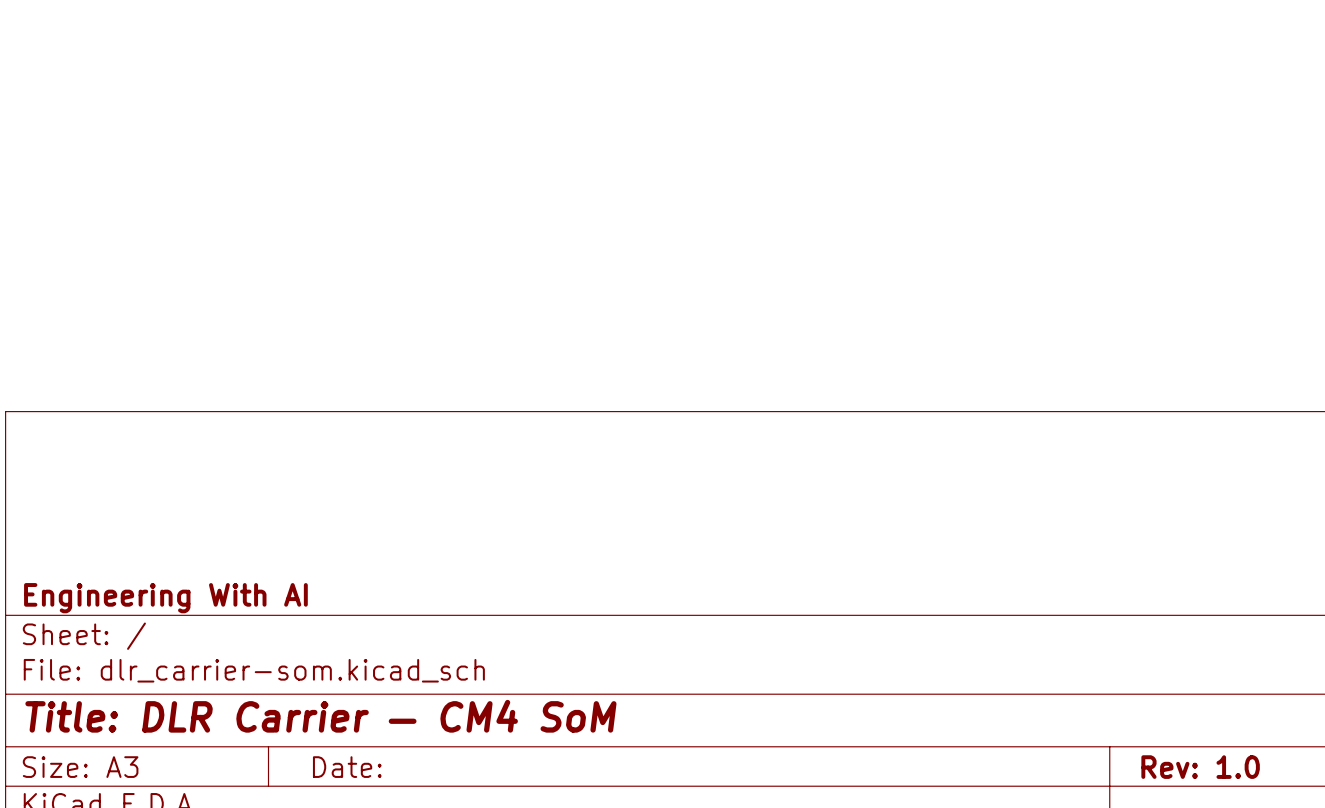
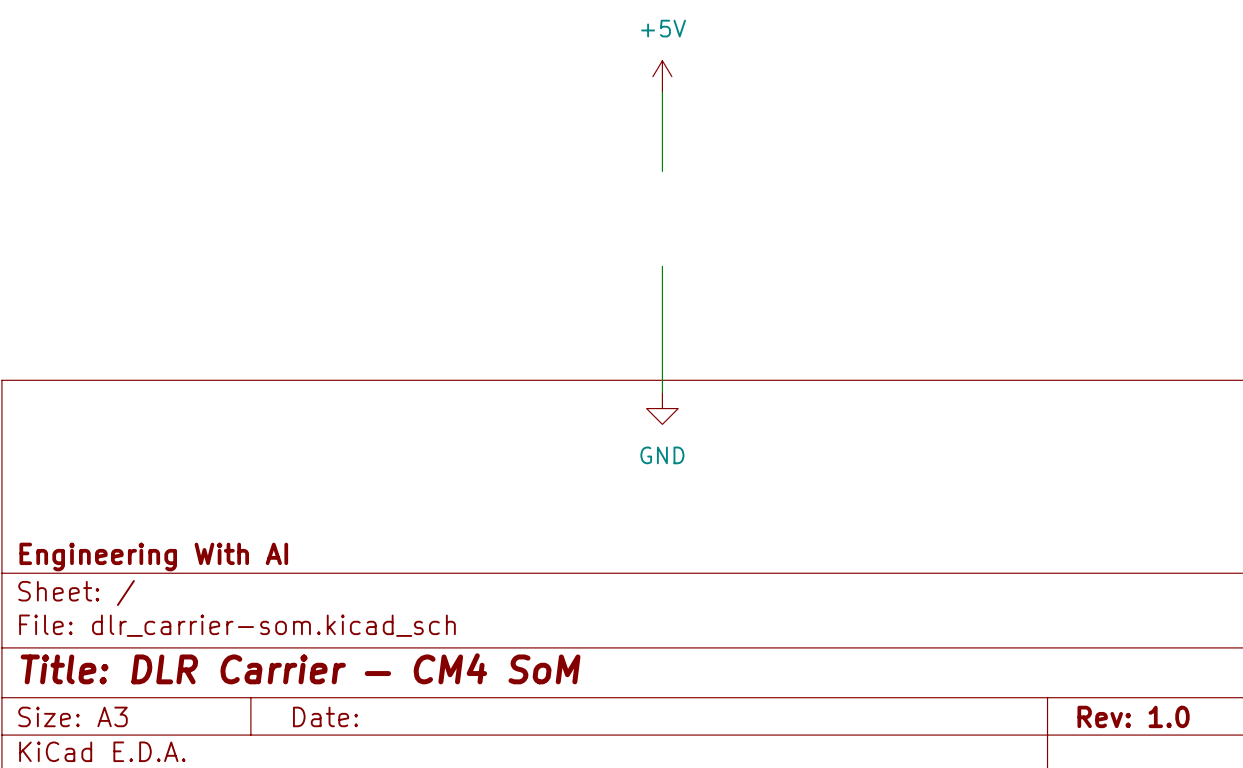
power symbol: none -> +5V (662, 76)
wire: none -> (662, 92) (662, 171)
wire: none -> (662, 266) (662, 392)
power symbol: none -> GND (662, 408)

